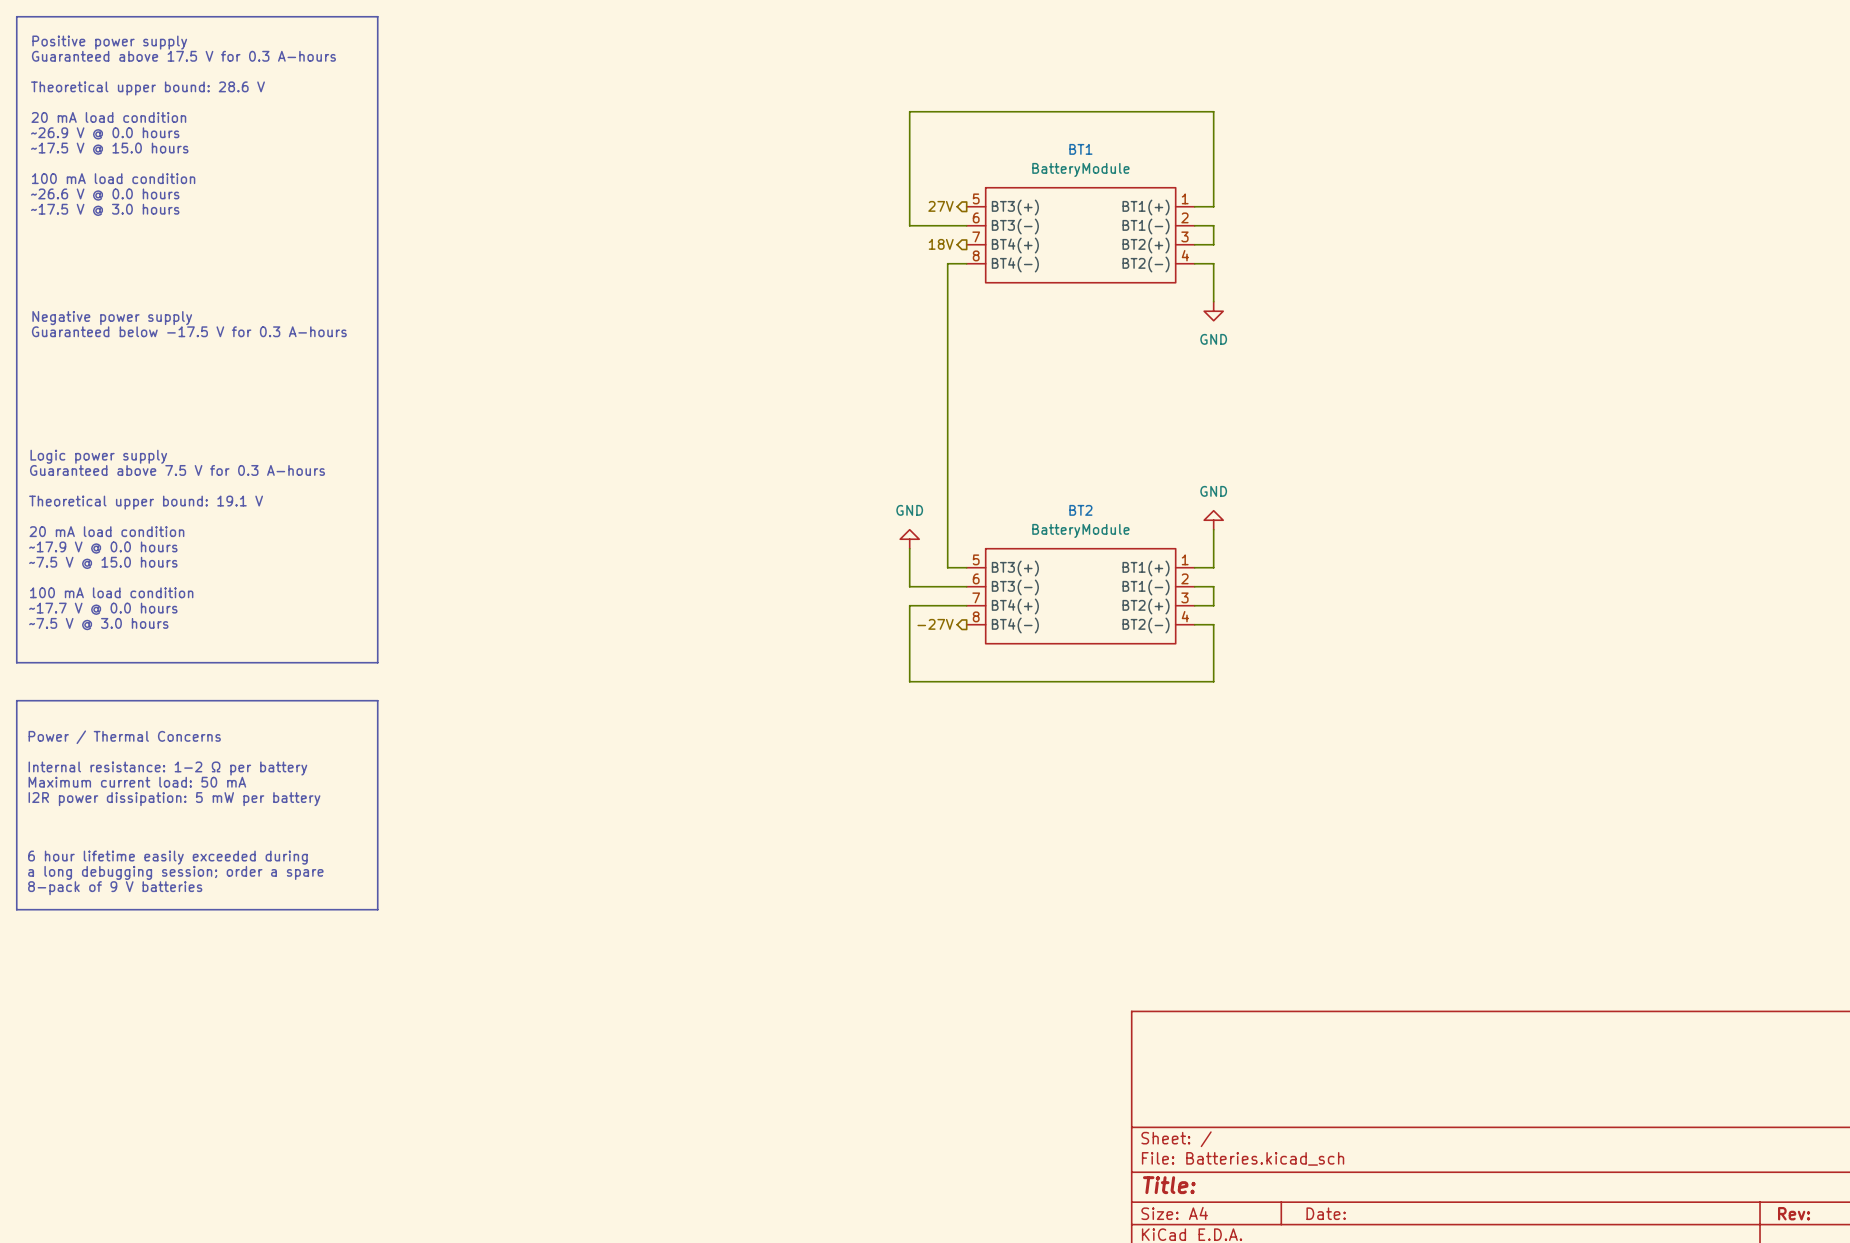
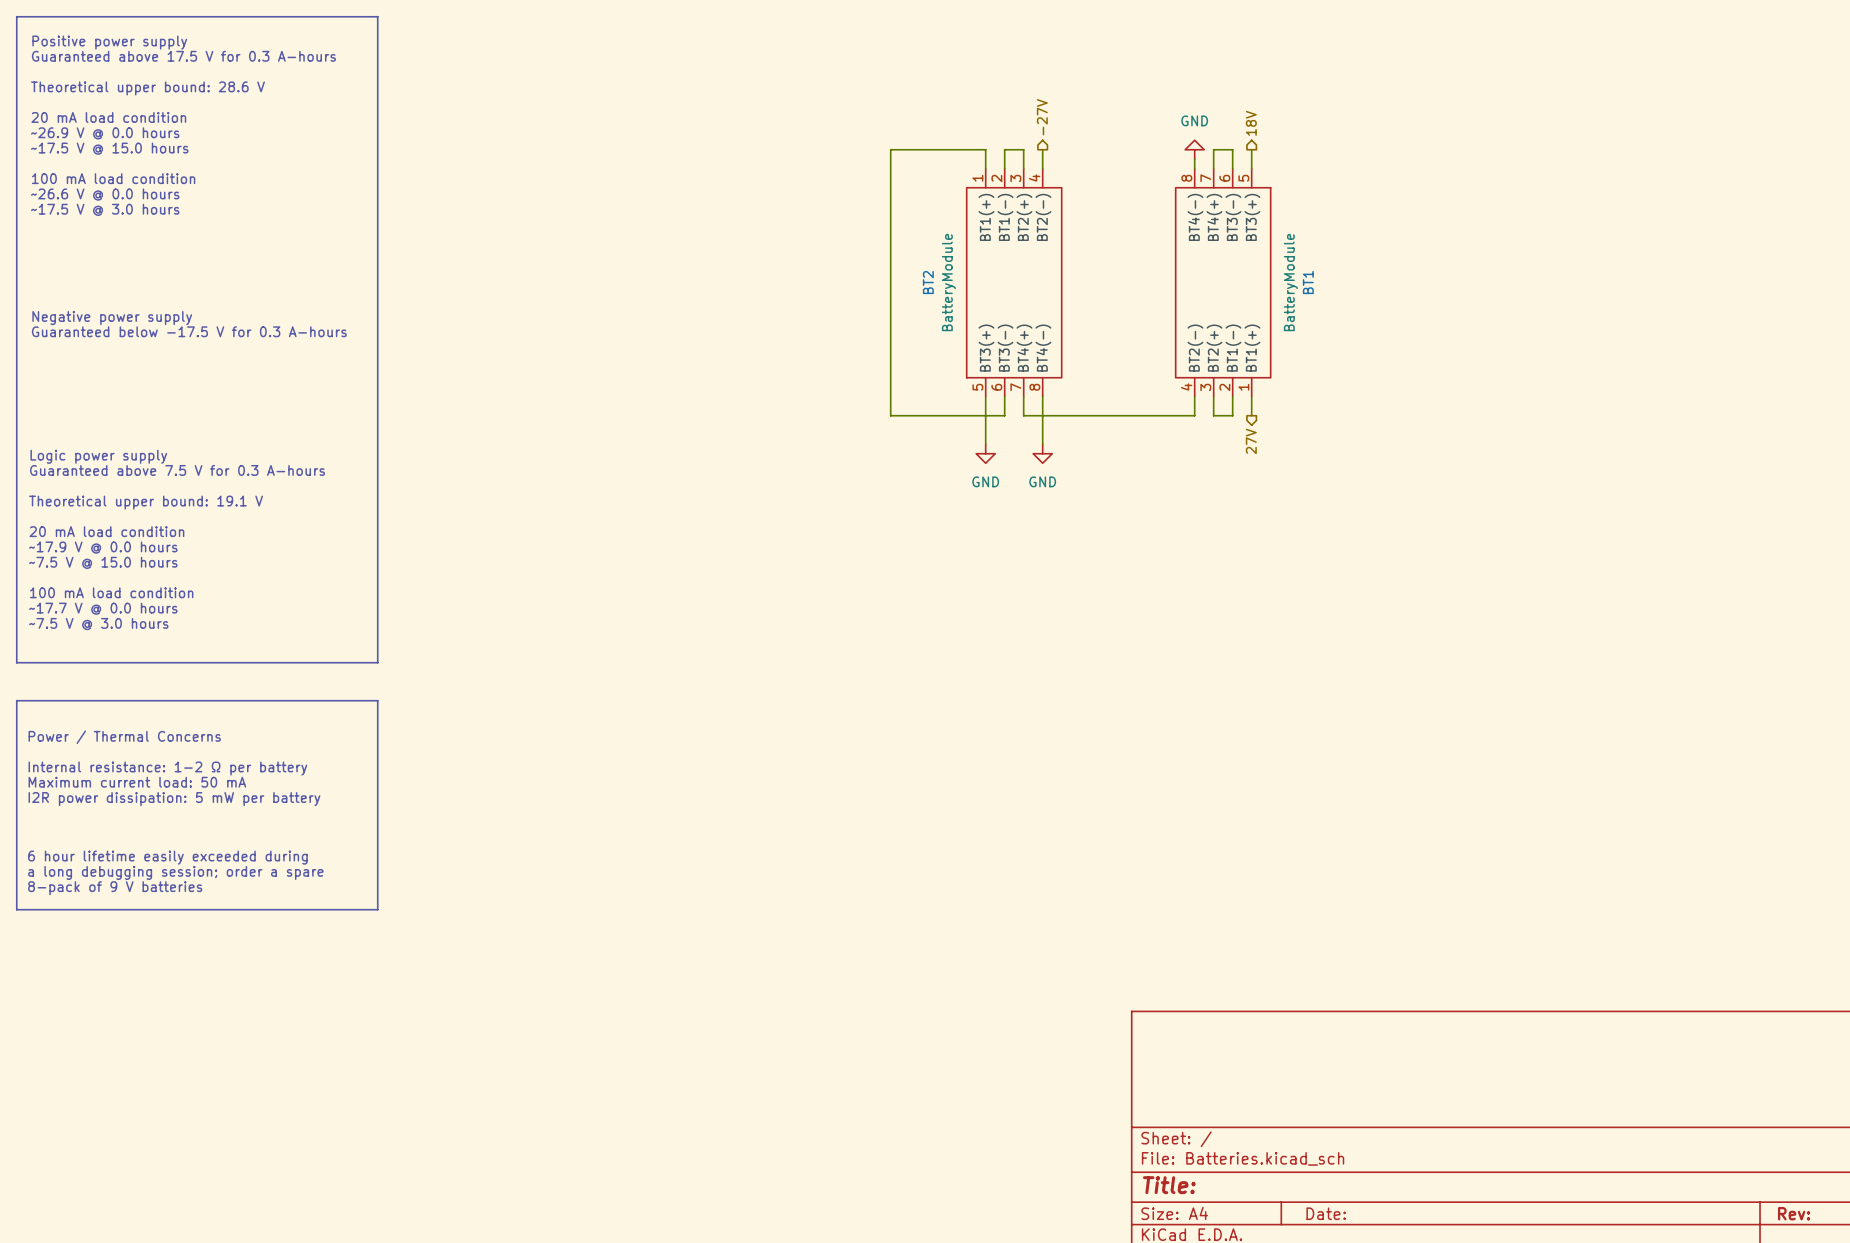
hierarchical label: none -> -27V (1042, 117)
hierarchical label: none -> 18V (1251, 123)
wire: none -> (1042, 149) (1042, 168)
power symbol: none -> GND (1194, 149)
wire: (1213, 149) (1213, 111) (909, 111) (909, 225) (966, 225) -> (1213, 149) (1232, 149) (1232, 168)
wire: none -> (1251, 149) (1251, 168)
wire: none -> (1194, 159) (1194, 168)
wire: none -> (985, 168) (985, 149) (890, 149) (890, 415) (1004, 415) (1004, 396)
wire: none -> (1004, 168) (1004, 149) (1023, 149) (1023, 168)
wire: (1213, 168) (1213, 206) (1194, 206) -> none
hierarchical label: 27V (940, 206) -> none
wire: (1194, 225) (1213, 225) (1213, 244) (1194, 244) -> none
BT1 rotation: 0° (1080, 235) -> 90° clockwise (1223, 282)
BT1 position: (1080, 235) -> (1223, 282)
hierarchical label: 18V (941, 244) -> none
wire: (966, 263) (947, 263) (947, 567) (966, 567) -> none
wire: (1194, 263) (1213, 263) (1213, 301) -> none
power symbol: GND (1213, 311) -> none
wire: none -> (985, 396) (985, 444)
wire: none -> (1023, 396) (1023, 415) (1194, 415) (1194, 396)
wire: none -> (1042, 396) (1042, 444)
wire: none -> (1213, 396) (1213, 415) (1232, 415) (1232, 396)
wire: none -> (1251, 396) (1251, 415)
hierarchical label: none -> 27V (1251, 441)
power symbol: none -> GND (985, 453)
power symbol: none -> GND (1042, 453)
power symbol: GND (1213, 520) -> none
wire: (1213, 529) (1213, 567) (1194, 567) -> none
power symbol: GND (909, 539) -> none
wire: (909, 548) (909, 586) (966, 586) -> none
wire: (1194, 586) (1213, 586) (1213, 605) (1194, 605) -> none
BT2 rotation: 0° (1080, 596) -> 90° counterclockwise (1014, 282)
BT2 position: (1080, 596) -> (1014, 282)
wire: (966, 605) (909, 605) (909, 681) (1213, 681) (1213, 624) (1194, 624) -> none
hierarchical label: -27V (935, 624) -> none

